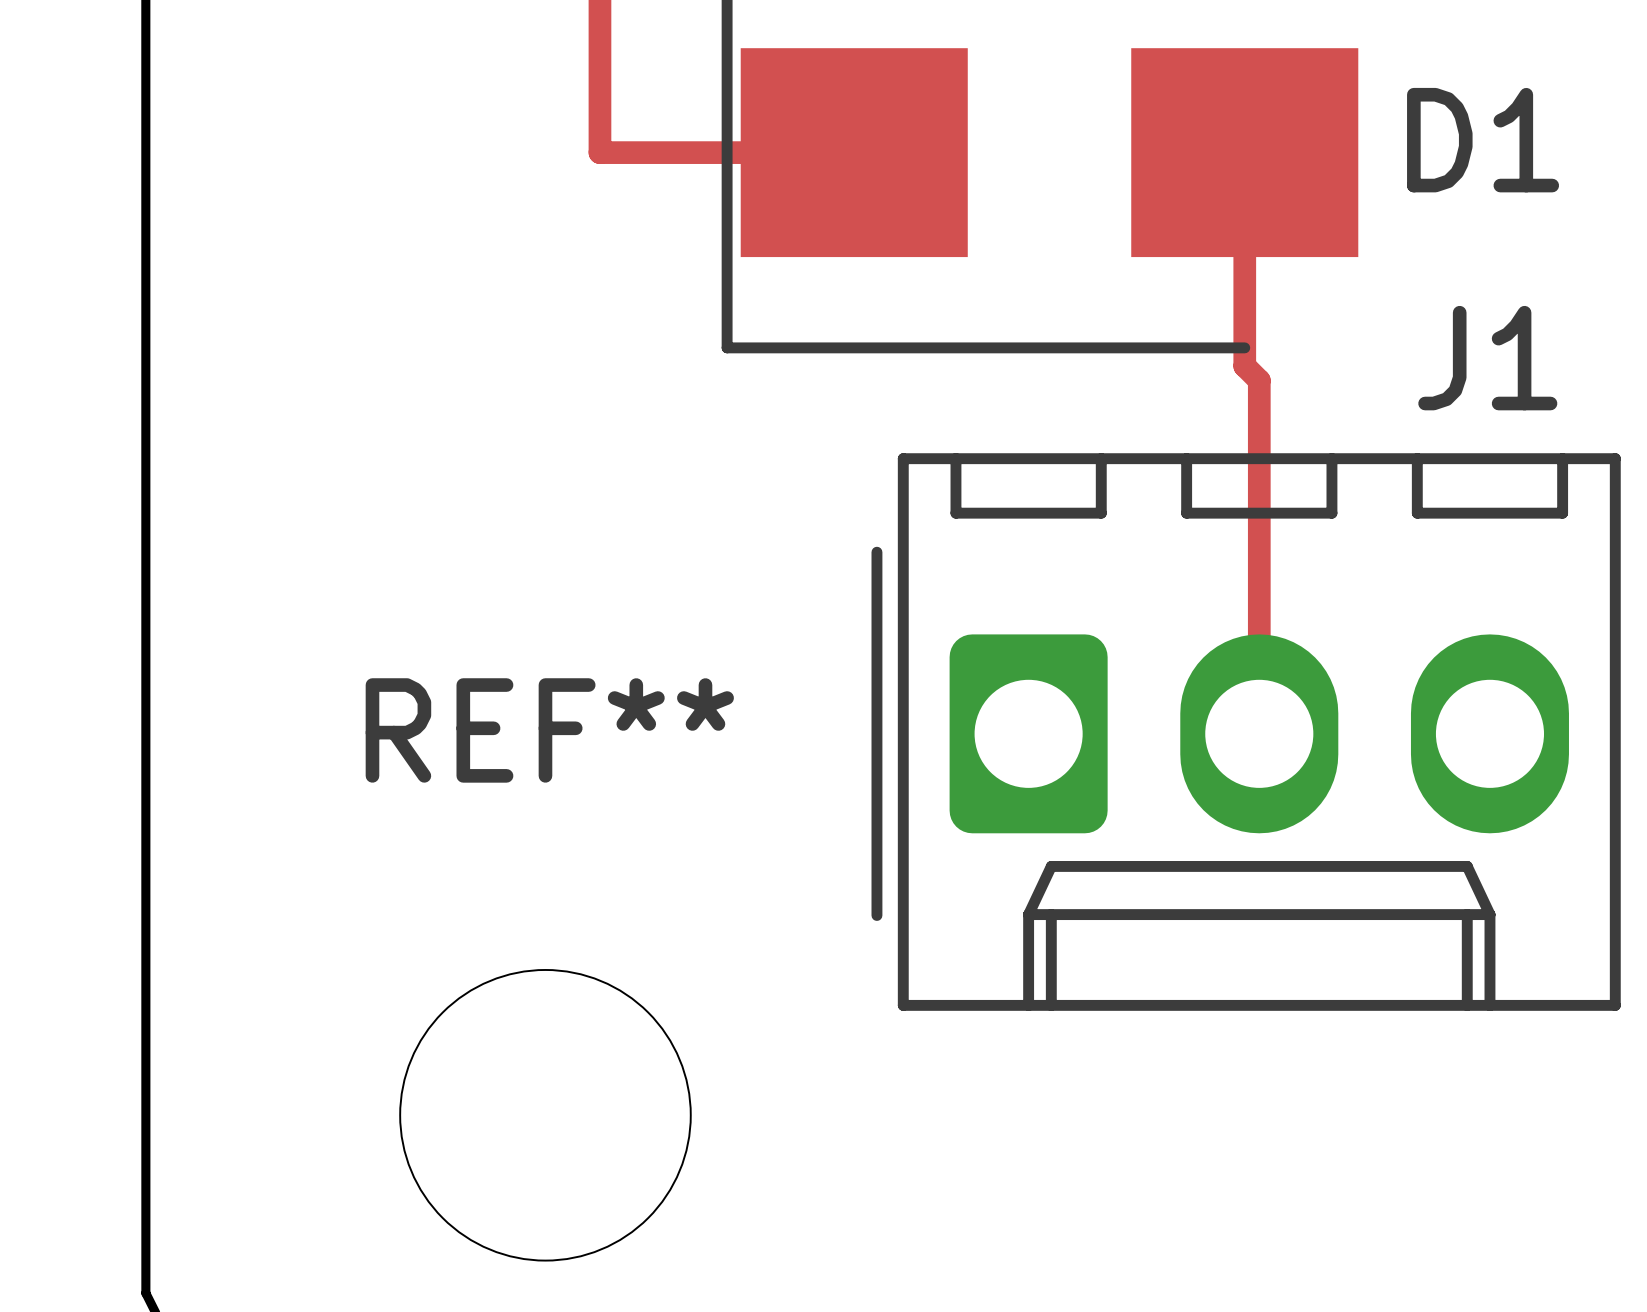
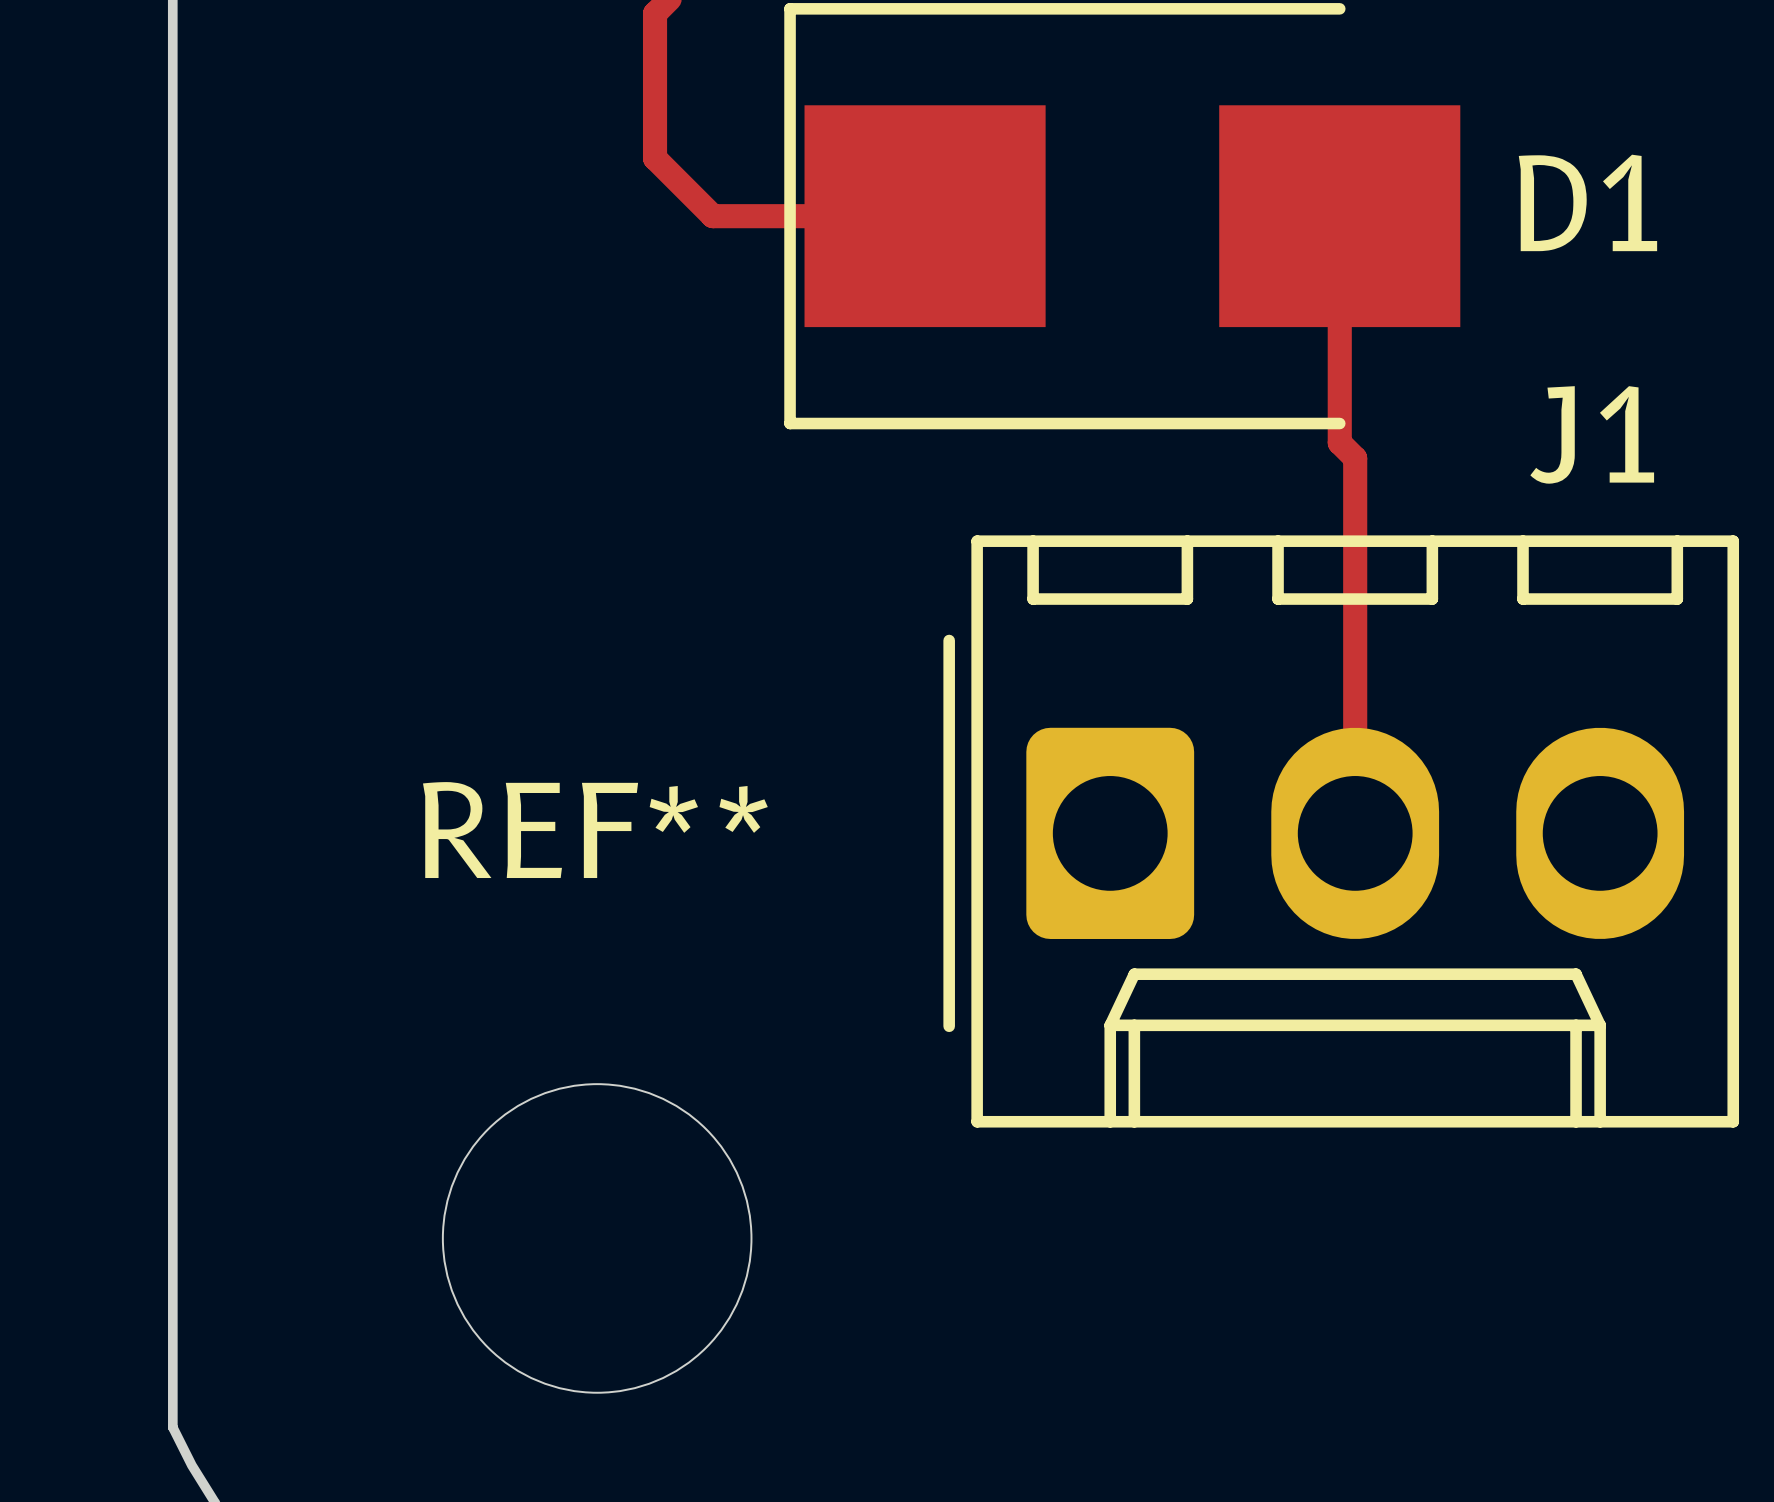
track: (599, 98) (599, 152) (654, 152) -> (655, 158) (712, 216)

